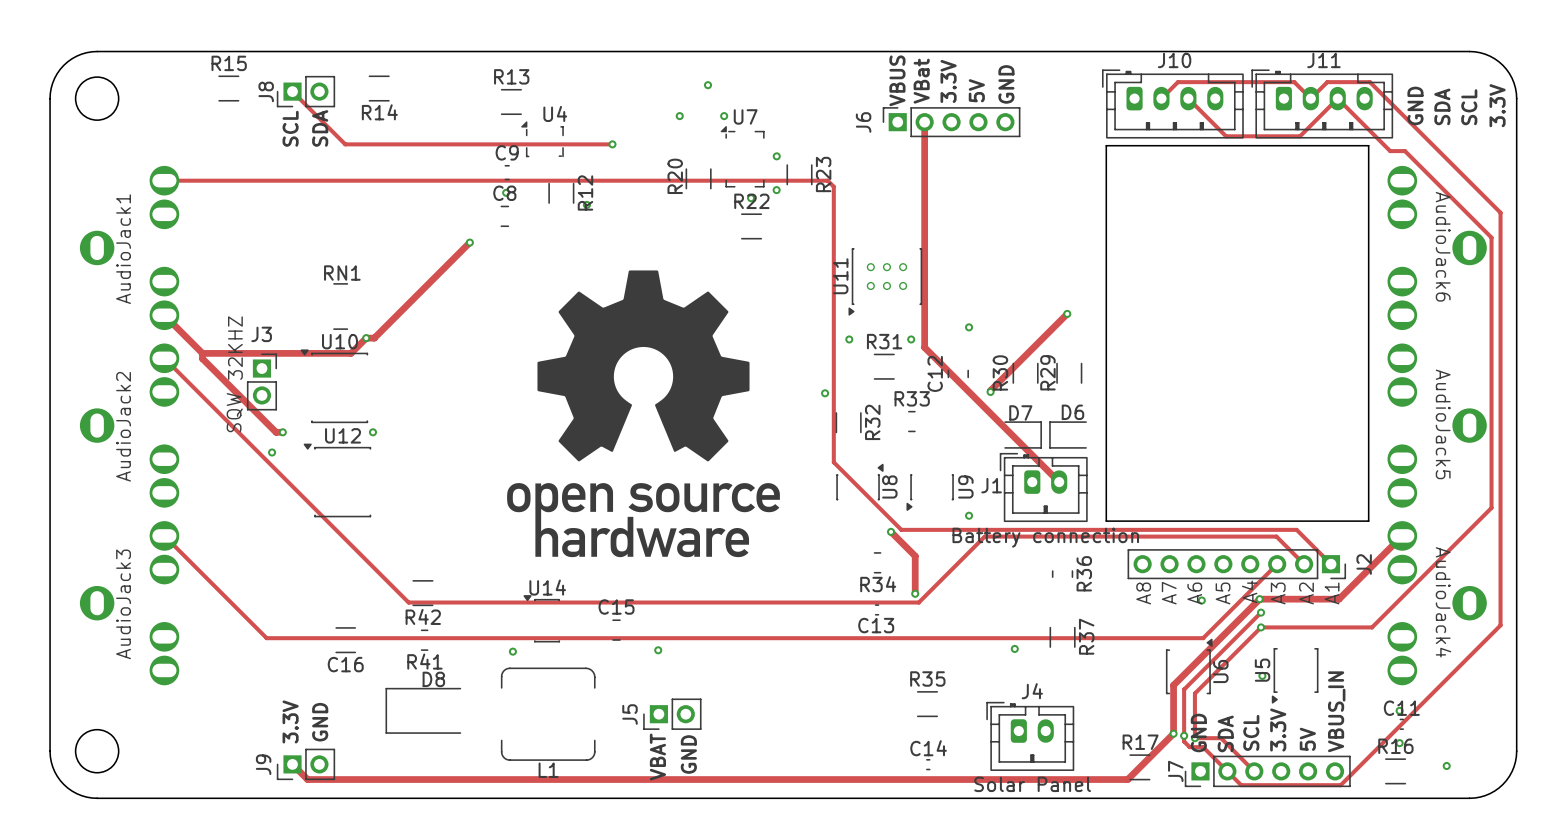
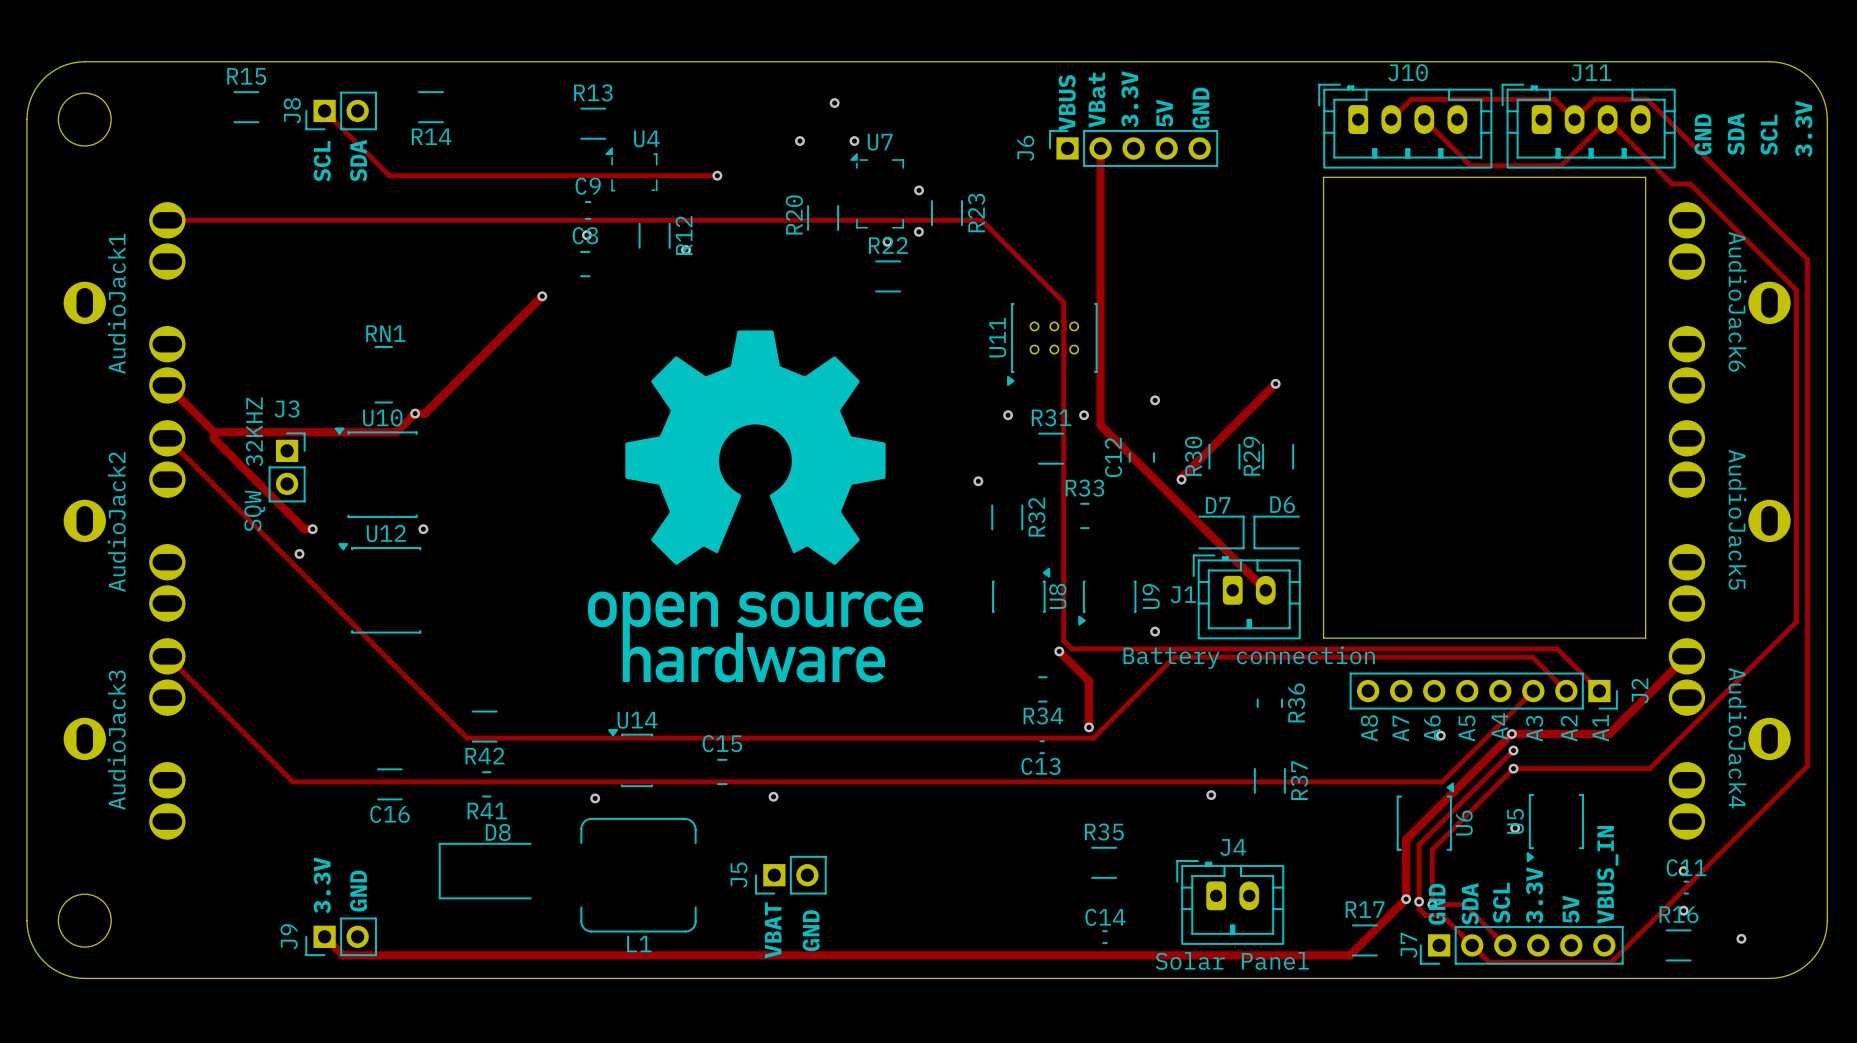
track: (833, 186) (833, 462) (894, 523) -> (989, 227) (1063, 302) (1063, 640)

